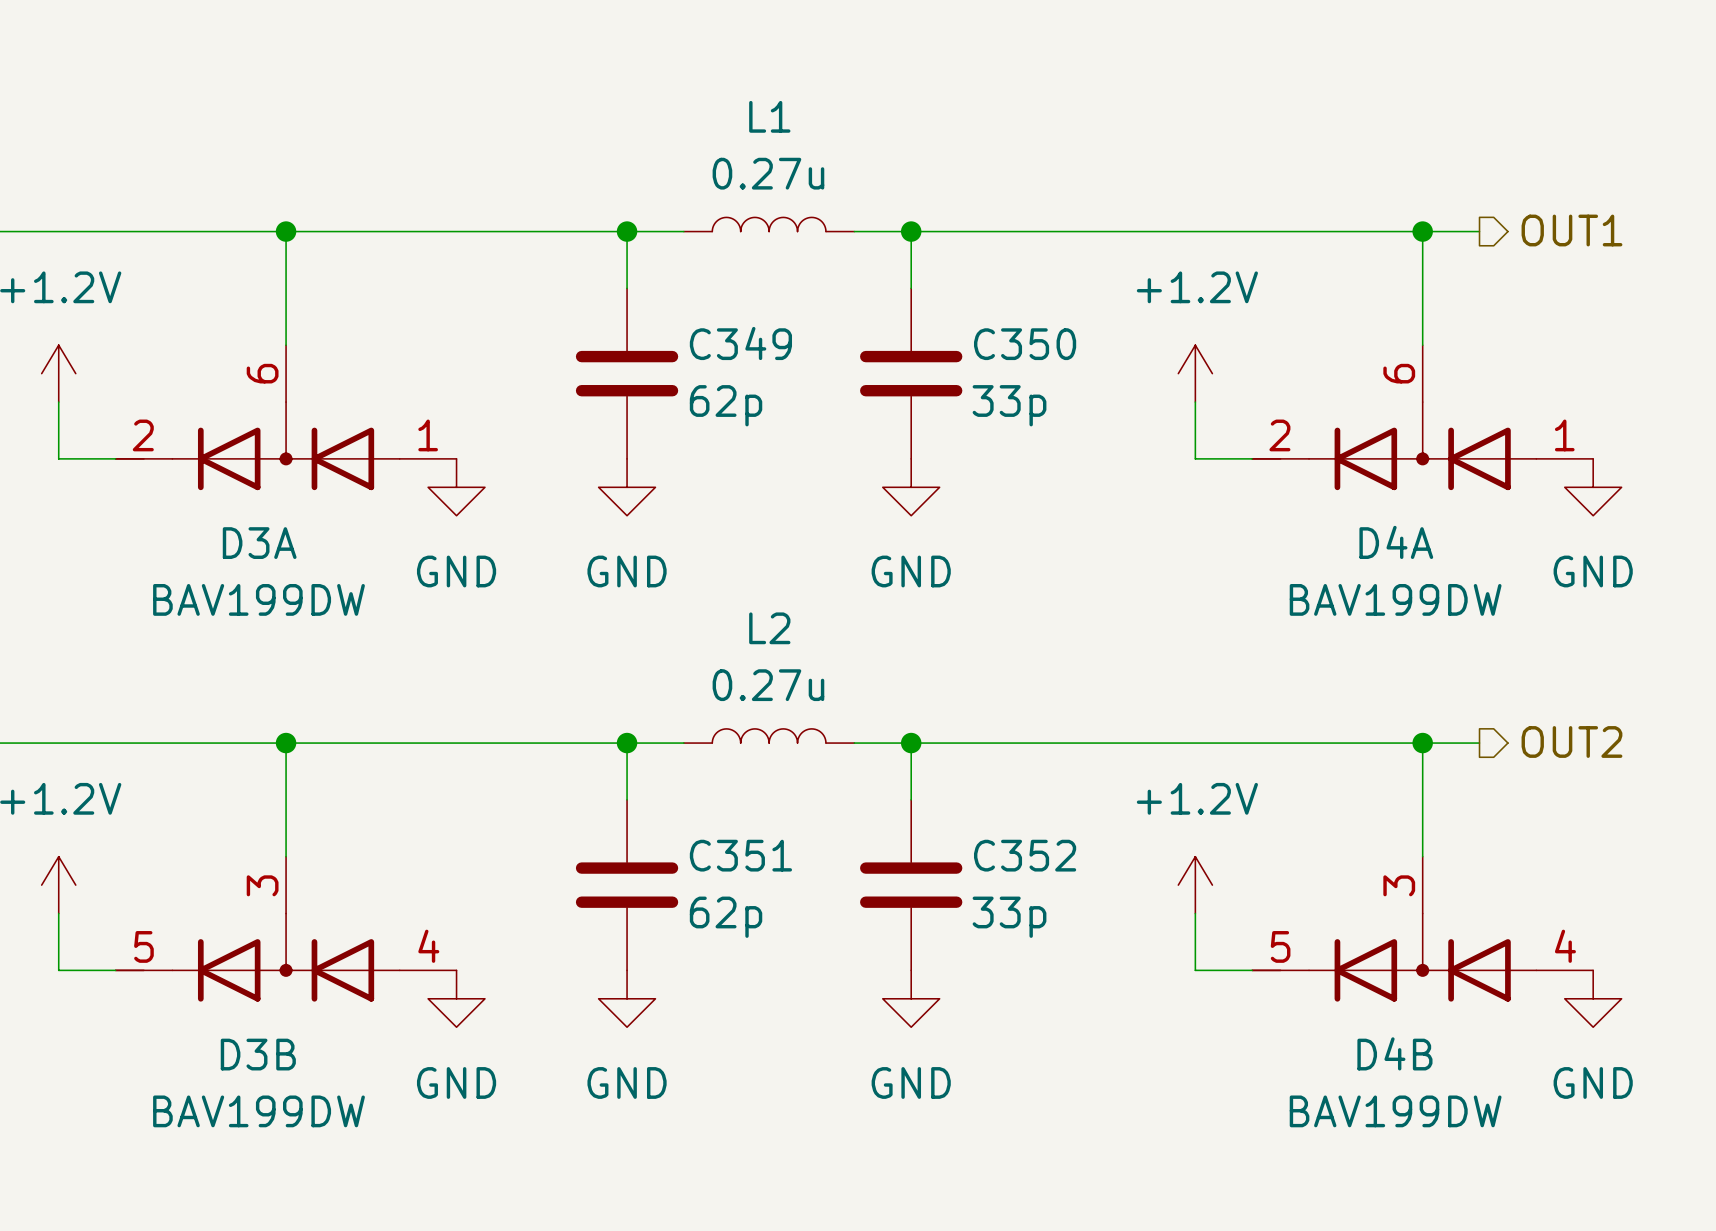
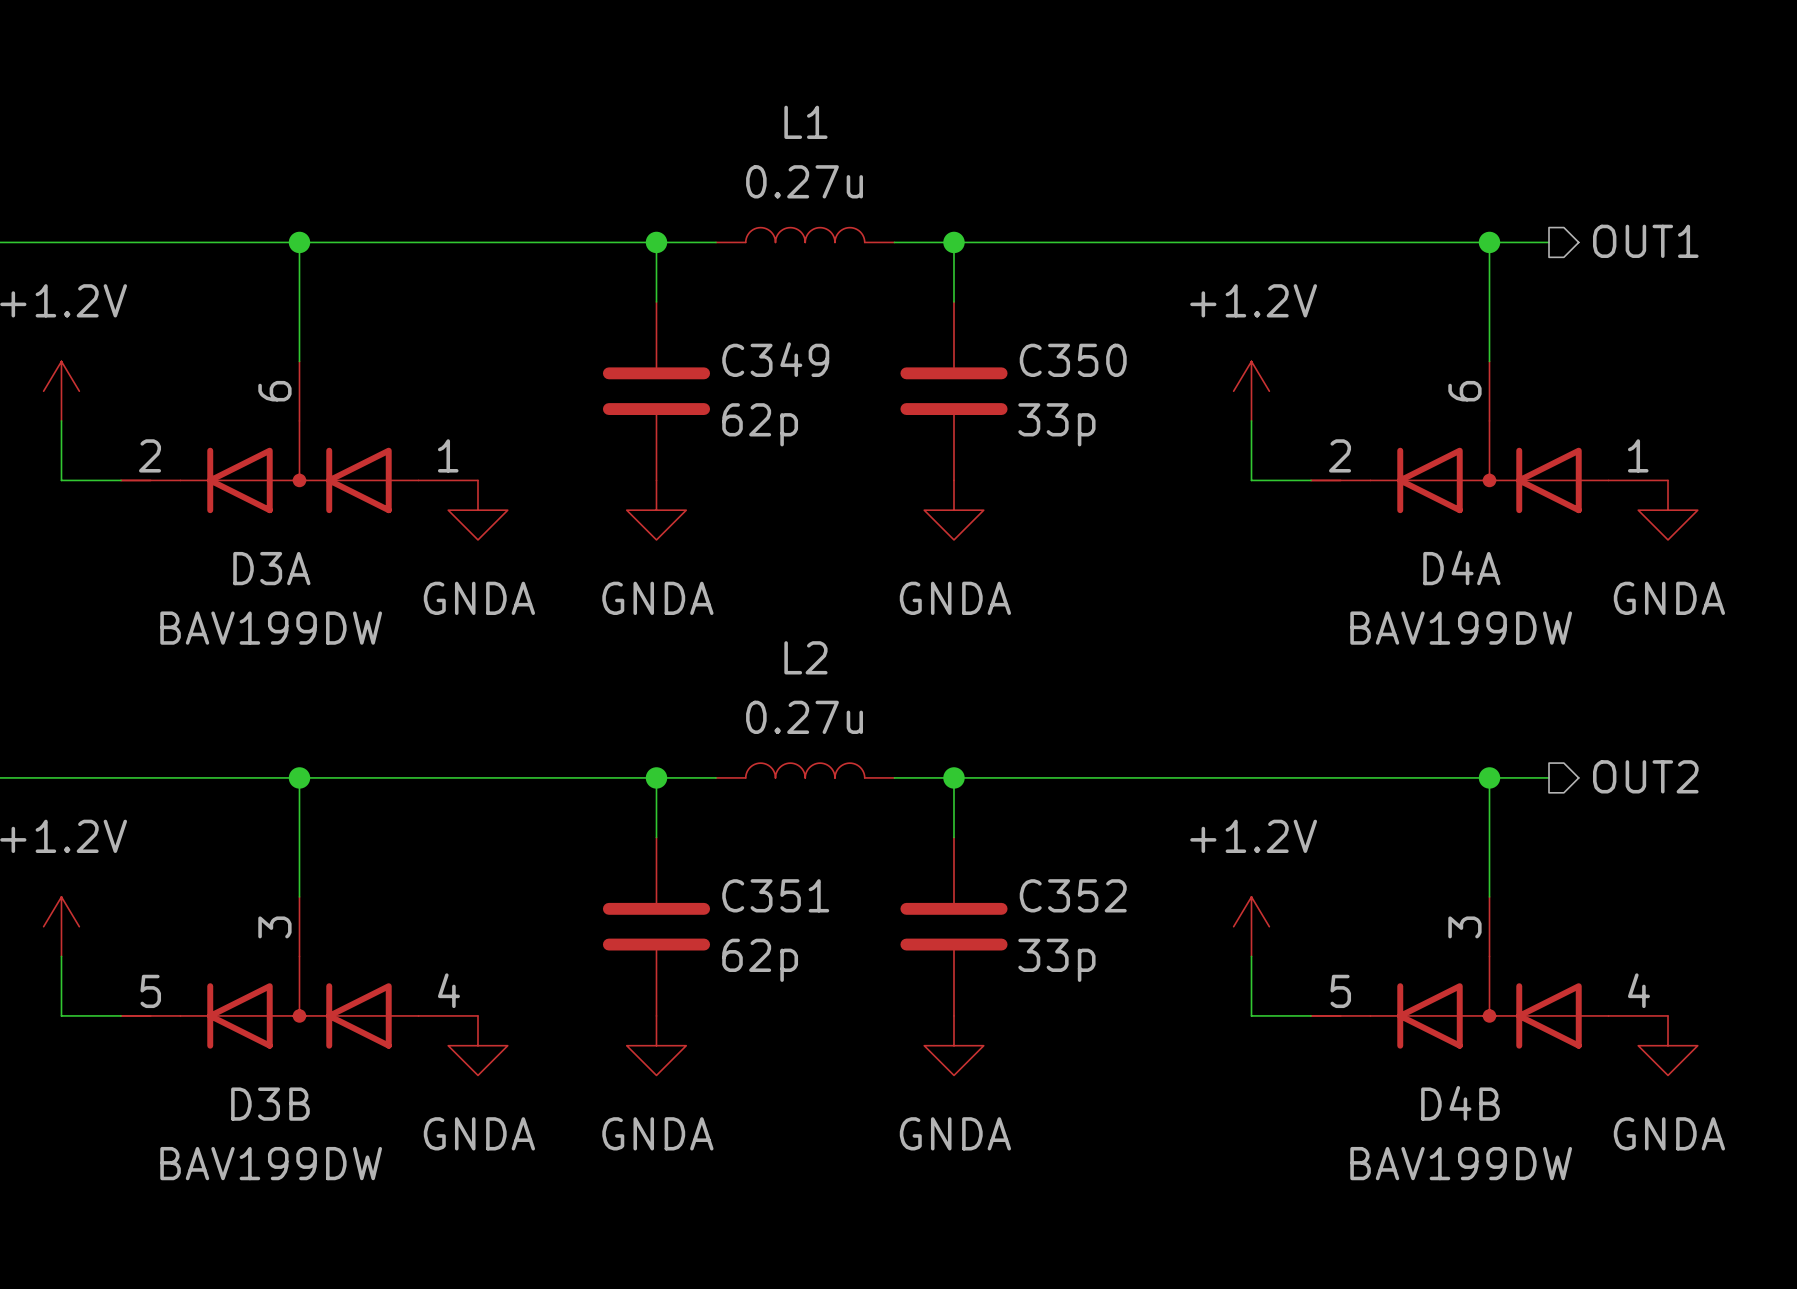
power symbol: GND (456, 487) -> GNDA (477, 510)
power symbol: GND (627, 487) -> GNDA (656, 510)
power symbol: GND (911, 487) -> GNDA (953, 510)
power symbol: GND (1593, 487) -> GNDA (1668, 510)
power symbol: GND (456, 998) -> GNDA (477, 1045)
power symbol: GND (627, 998) -> GNDA (656, 1045)
power symbol: GND (911, 998) -> GNDA (953, 1045)
power symbol: GND (1593, 998) -> GNDA (1668, 1045)

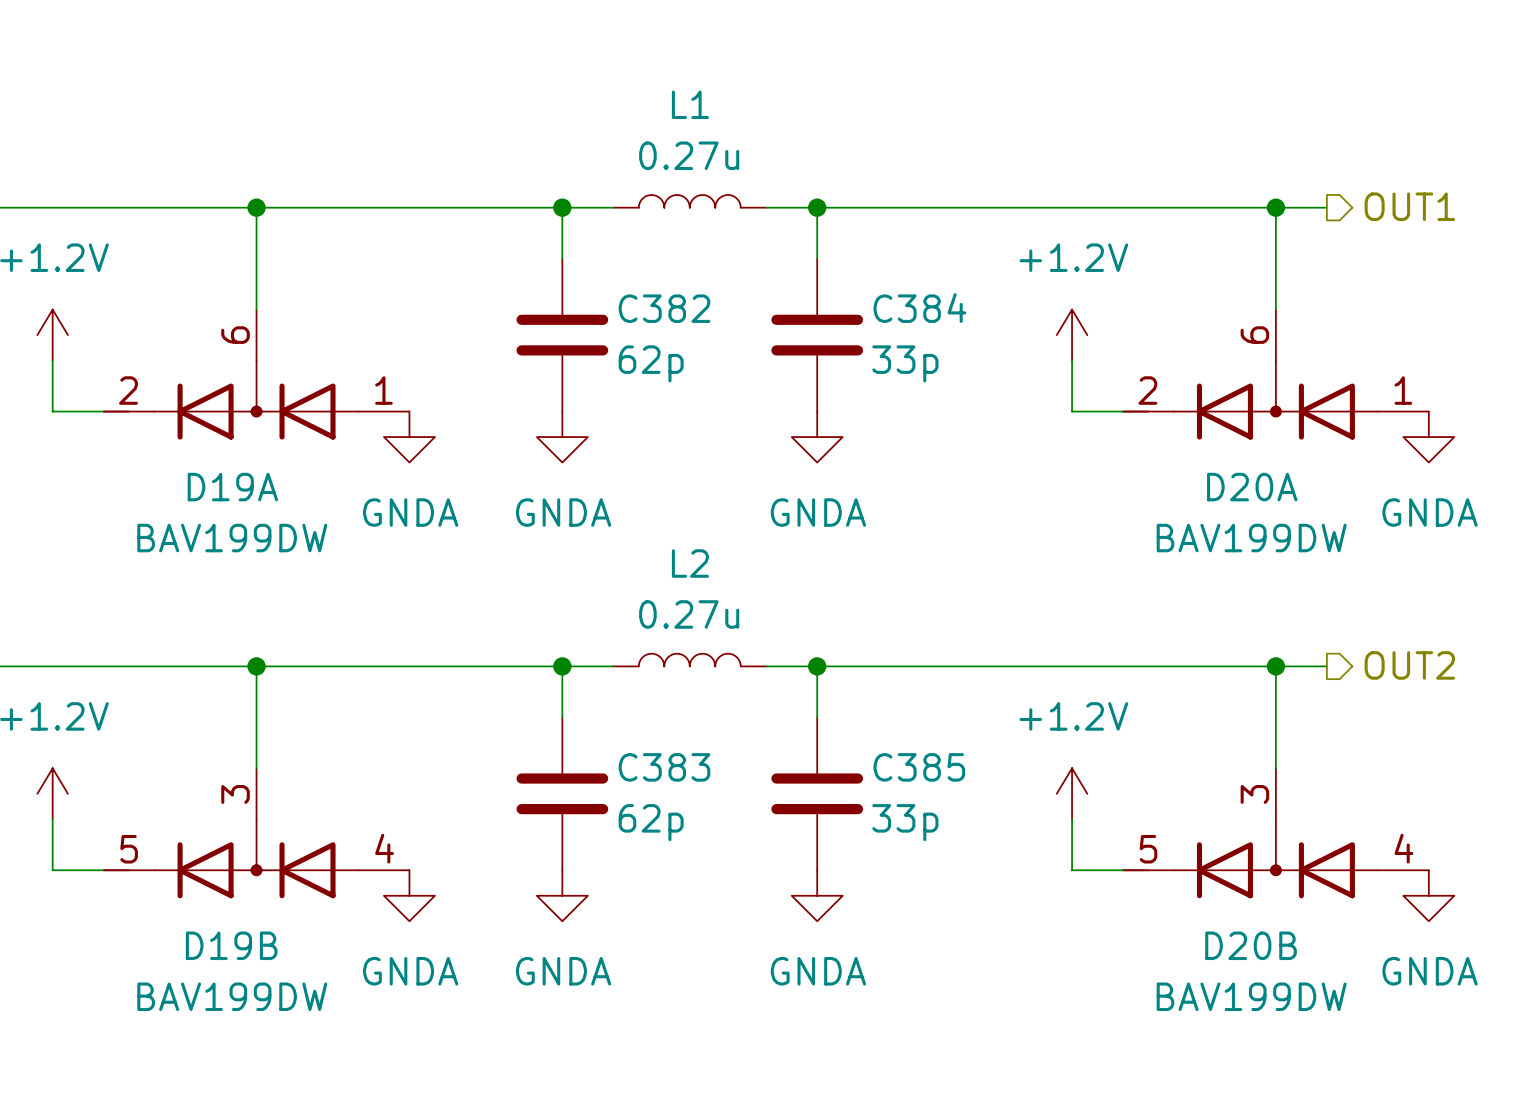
C349 name: C349 (775, 359) -> C382 (664, 308)
C350 name: C350 (1073, 360) -> C384 (919, 308)
D4A name: D4A (1461, 567) -> D20A (1252, 487)
D3A name: D3A (271, 568) -> D19A (232, 487)
C351 name: C351 (775, 895) -> C383 (664, 767)
C352 name: C352 (1073, 895) -> C385 (919, 767)
D4B name: D4B (1460, 1103) -> D20B (1251, 945)
D3B name: D3B (270, 1104) -> D19B (231, 945)

